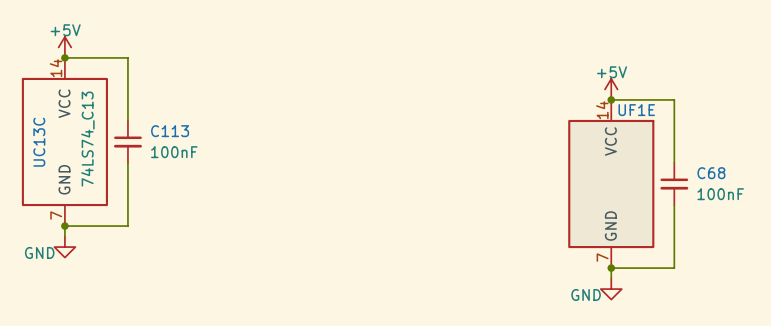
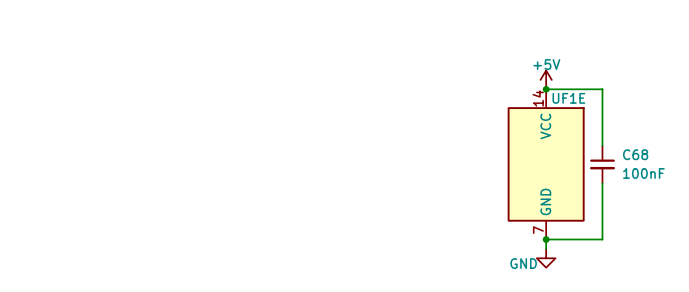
power symbol: +5V (64, 47) -> none
wire: (64, 57) (127, 57) (127, 120) -> none
junction: (64, 57) -> none
UC13C: 74LS74_C13 (64, 141) -> none
C113: 100nF (127, 141) -> none
wire: (127, 163) (127, 226) (64, 226) (64, 236) -> none
junction: (64, 226) -> none
power symbol: GND (64, 247) -> none

